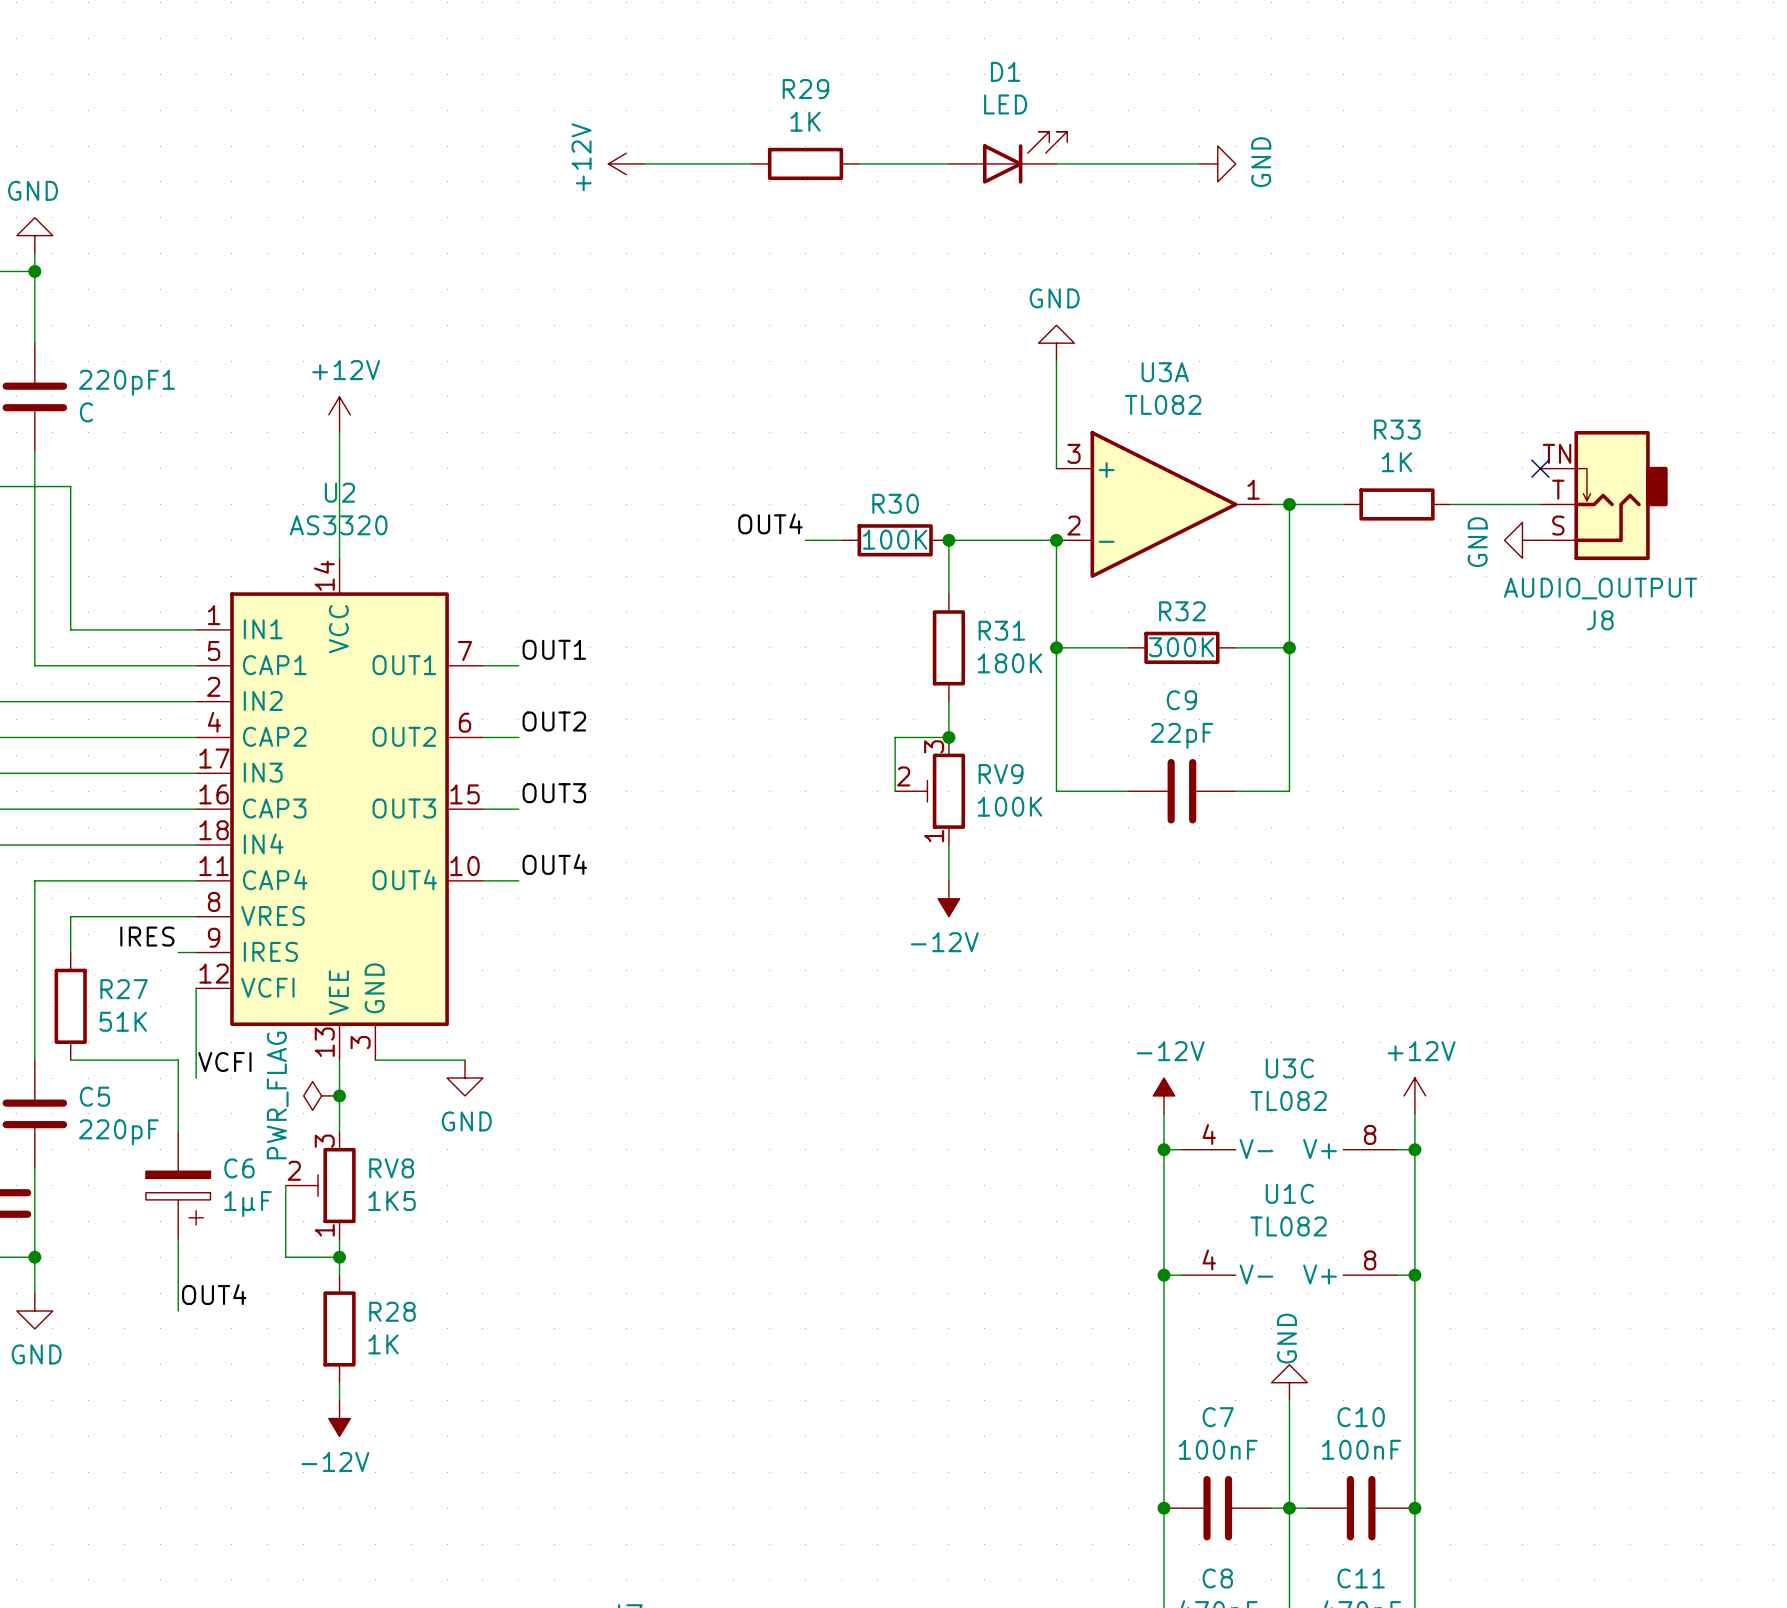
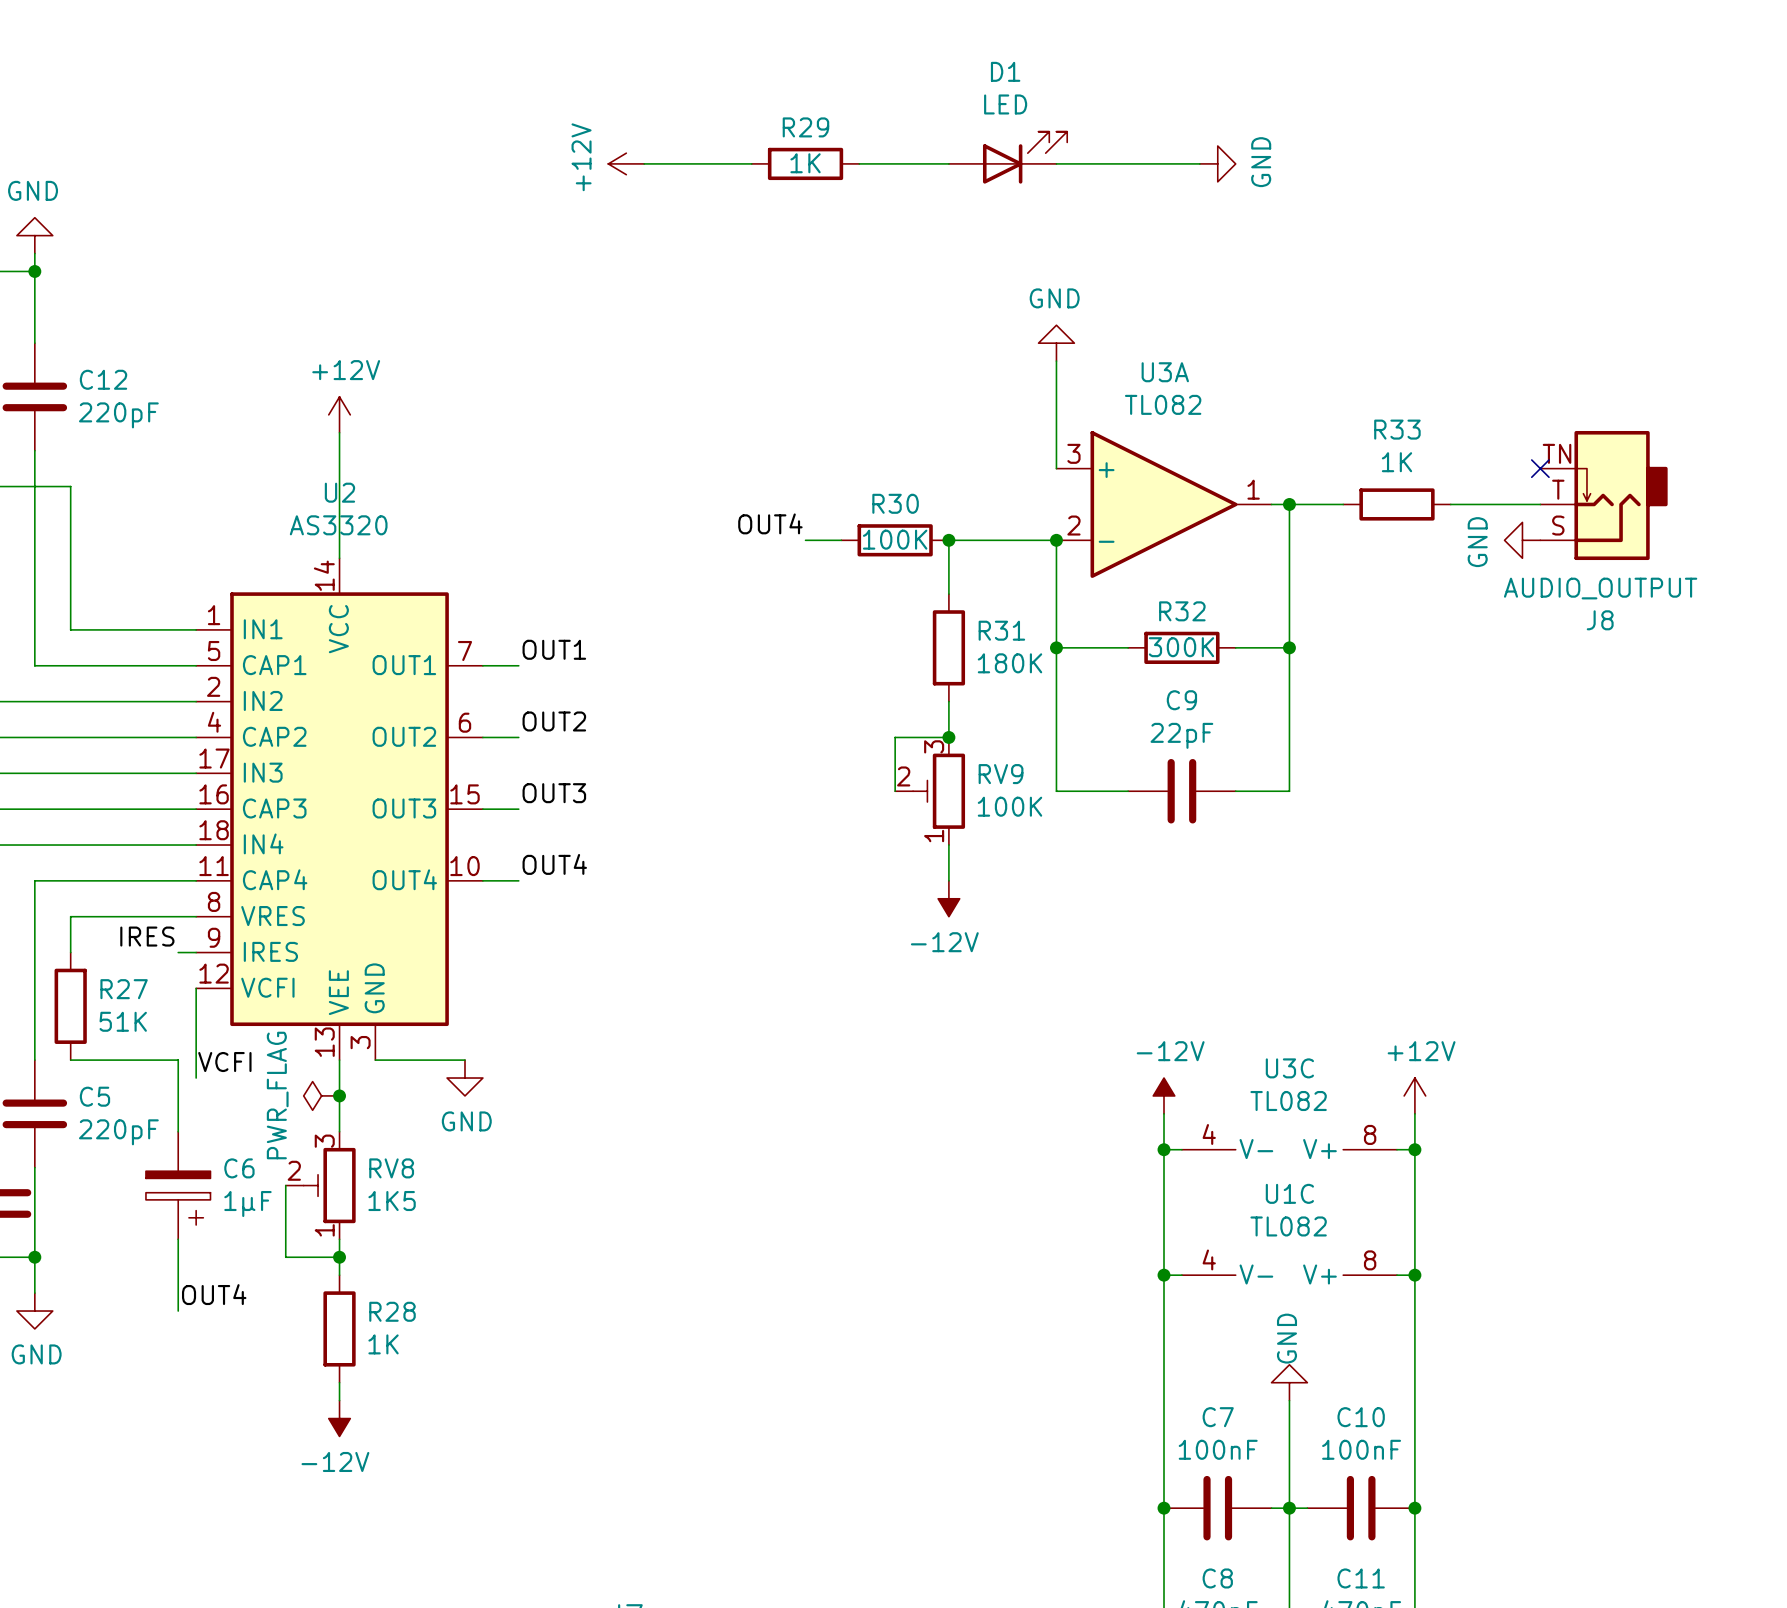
R29 name position: R29 (805, 89) -> R29 (805, 127)
R29 value position: 1K (805, 121) -> 1K (805, 163)
220pF1 name: 220pF1 (126, 382) -> C12 (103, 379)
220pF1 value: C (86, 412) -> 220pF (118, 415)

